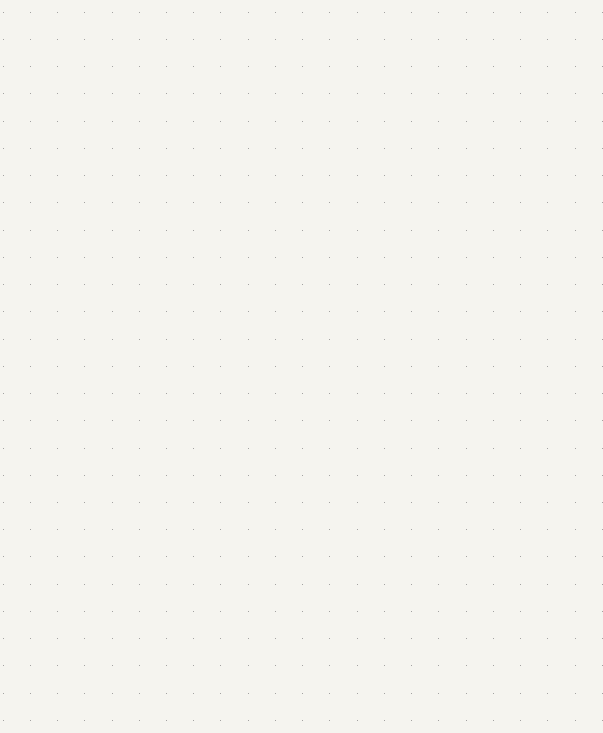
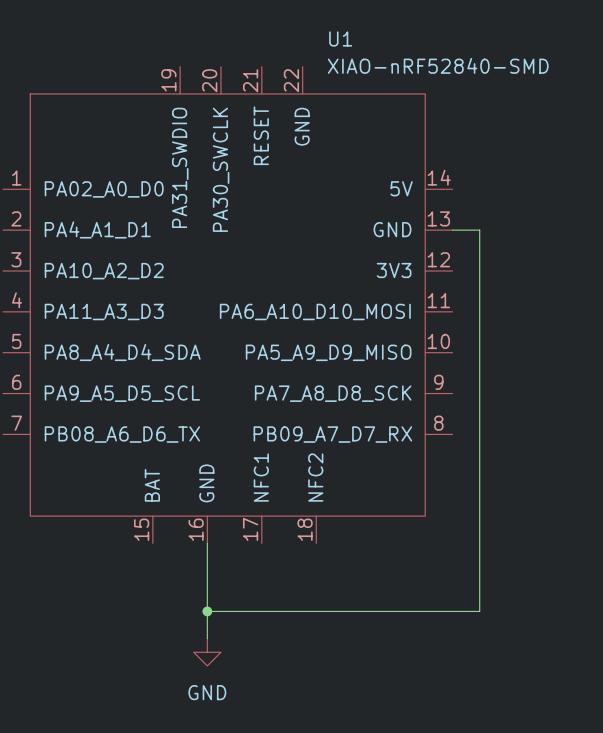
wire: none -> (452, 230) (479, 230) (479, 611) (207, 611)
U1: none -> XIAO-nRF52840-SMD (227, 305)
wire: none -> (207, 543) (207, 638)
junction: none -> (207, 611)
power symbol: none -> GND (207, 652)

